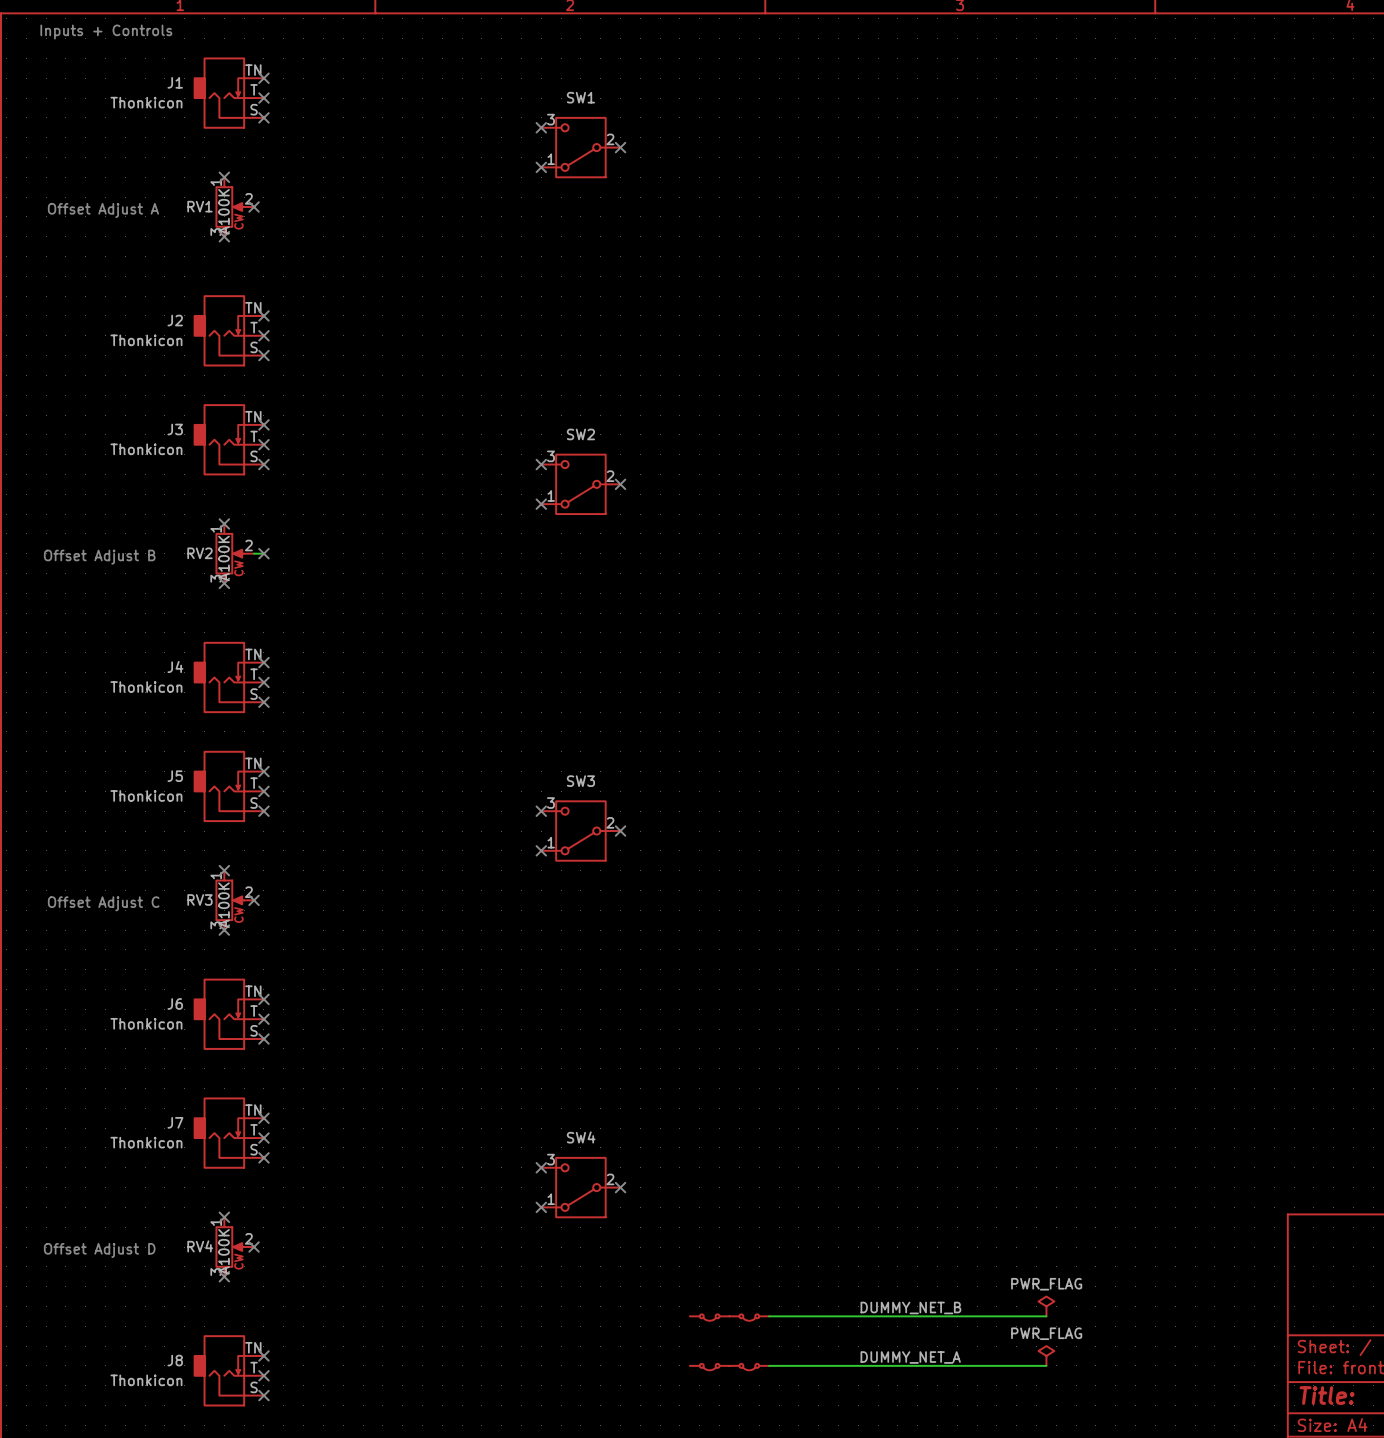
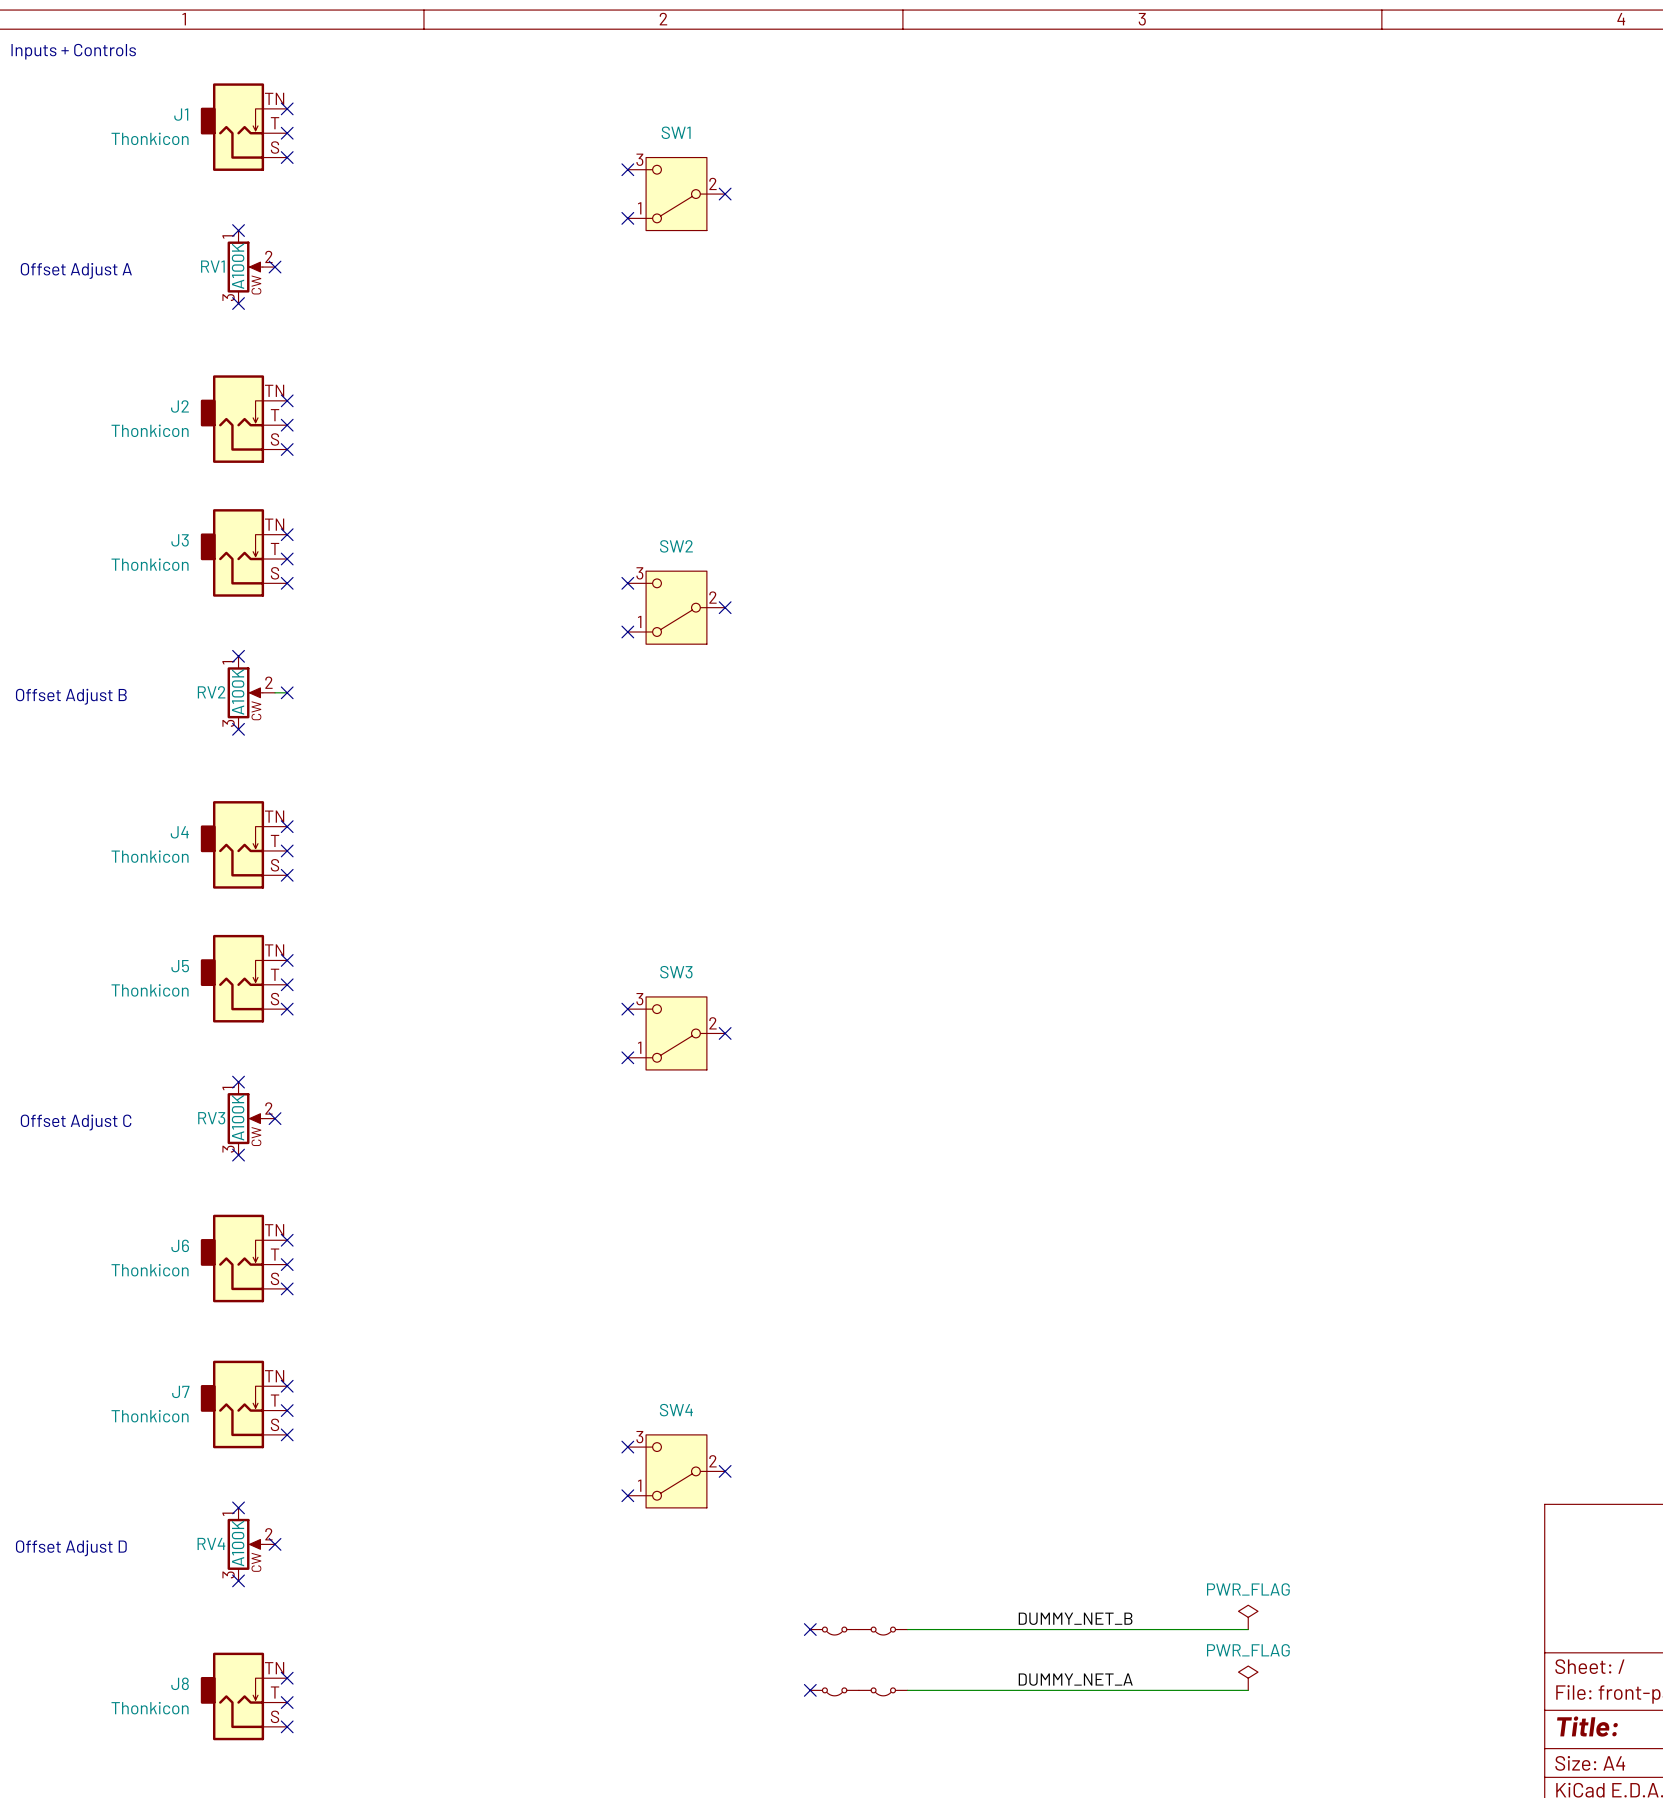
no-connect mark: none -> (810, 1629)
no-connect mark: none -> (810, 1690)

